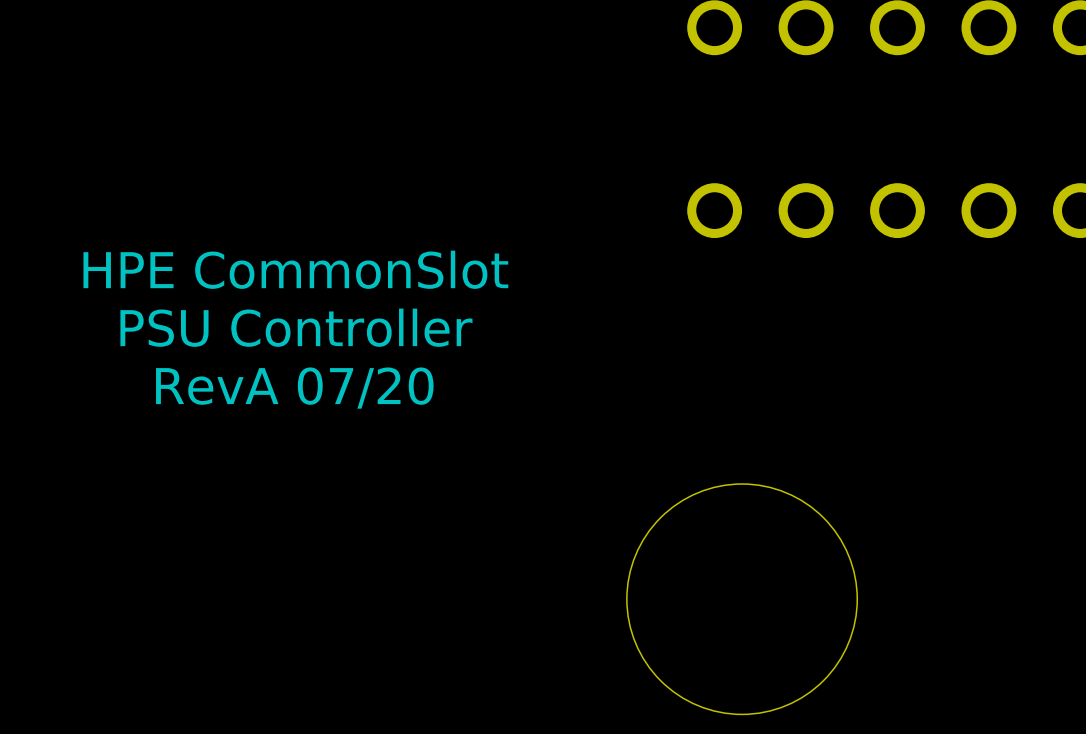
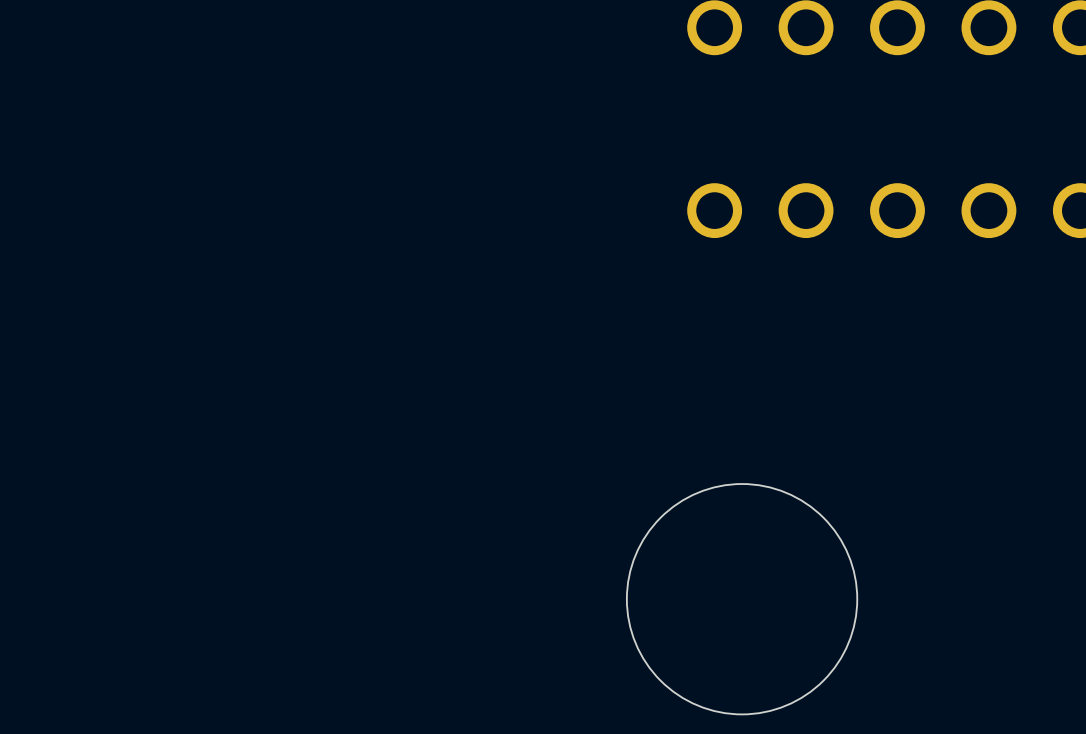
text: HPE CommonSlot (295, 269) -> none
text: PSU Controller (296, 327) -> none
text: RevA 07/20 (294, 388) -> none

